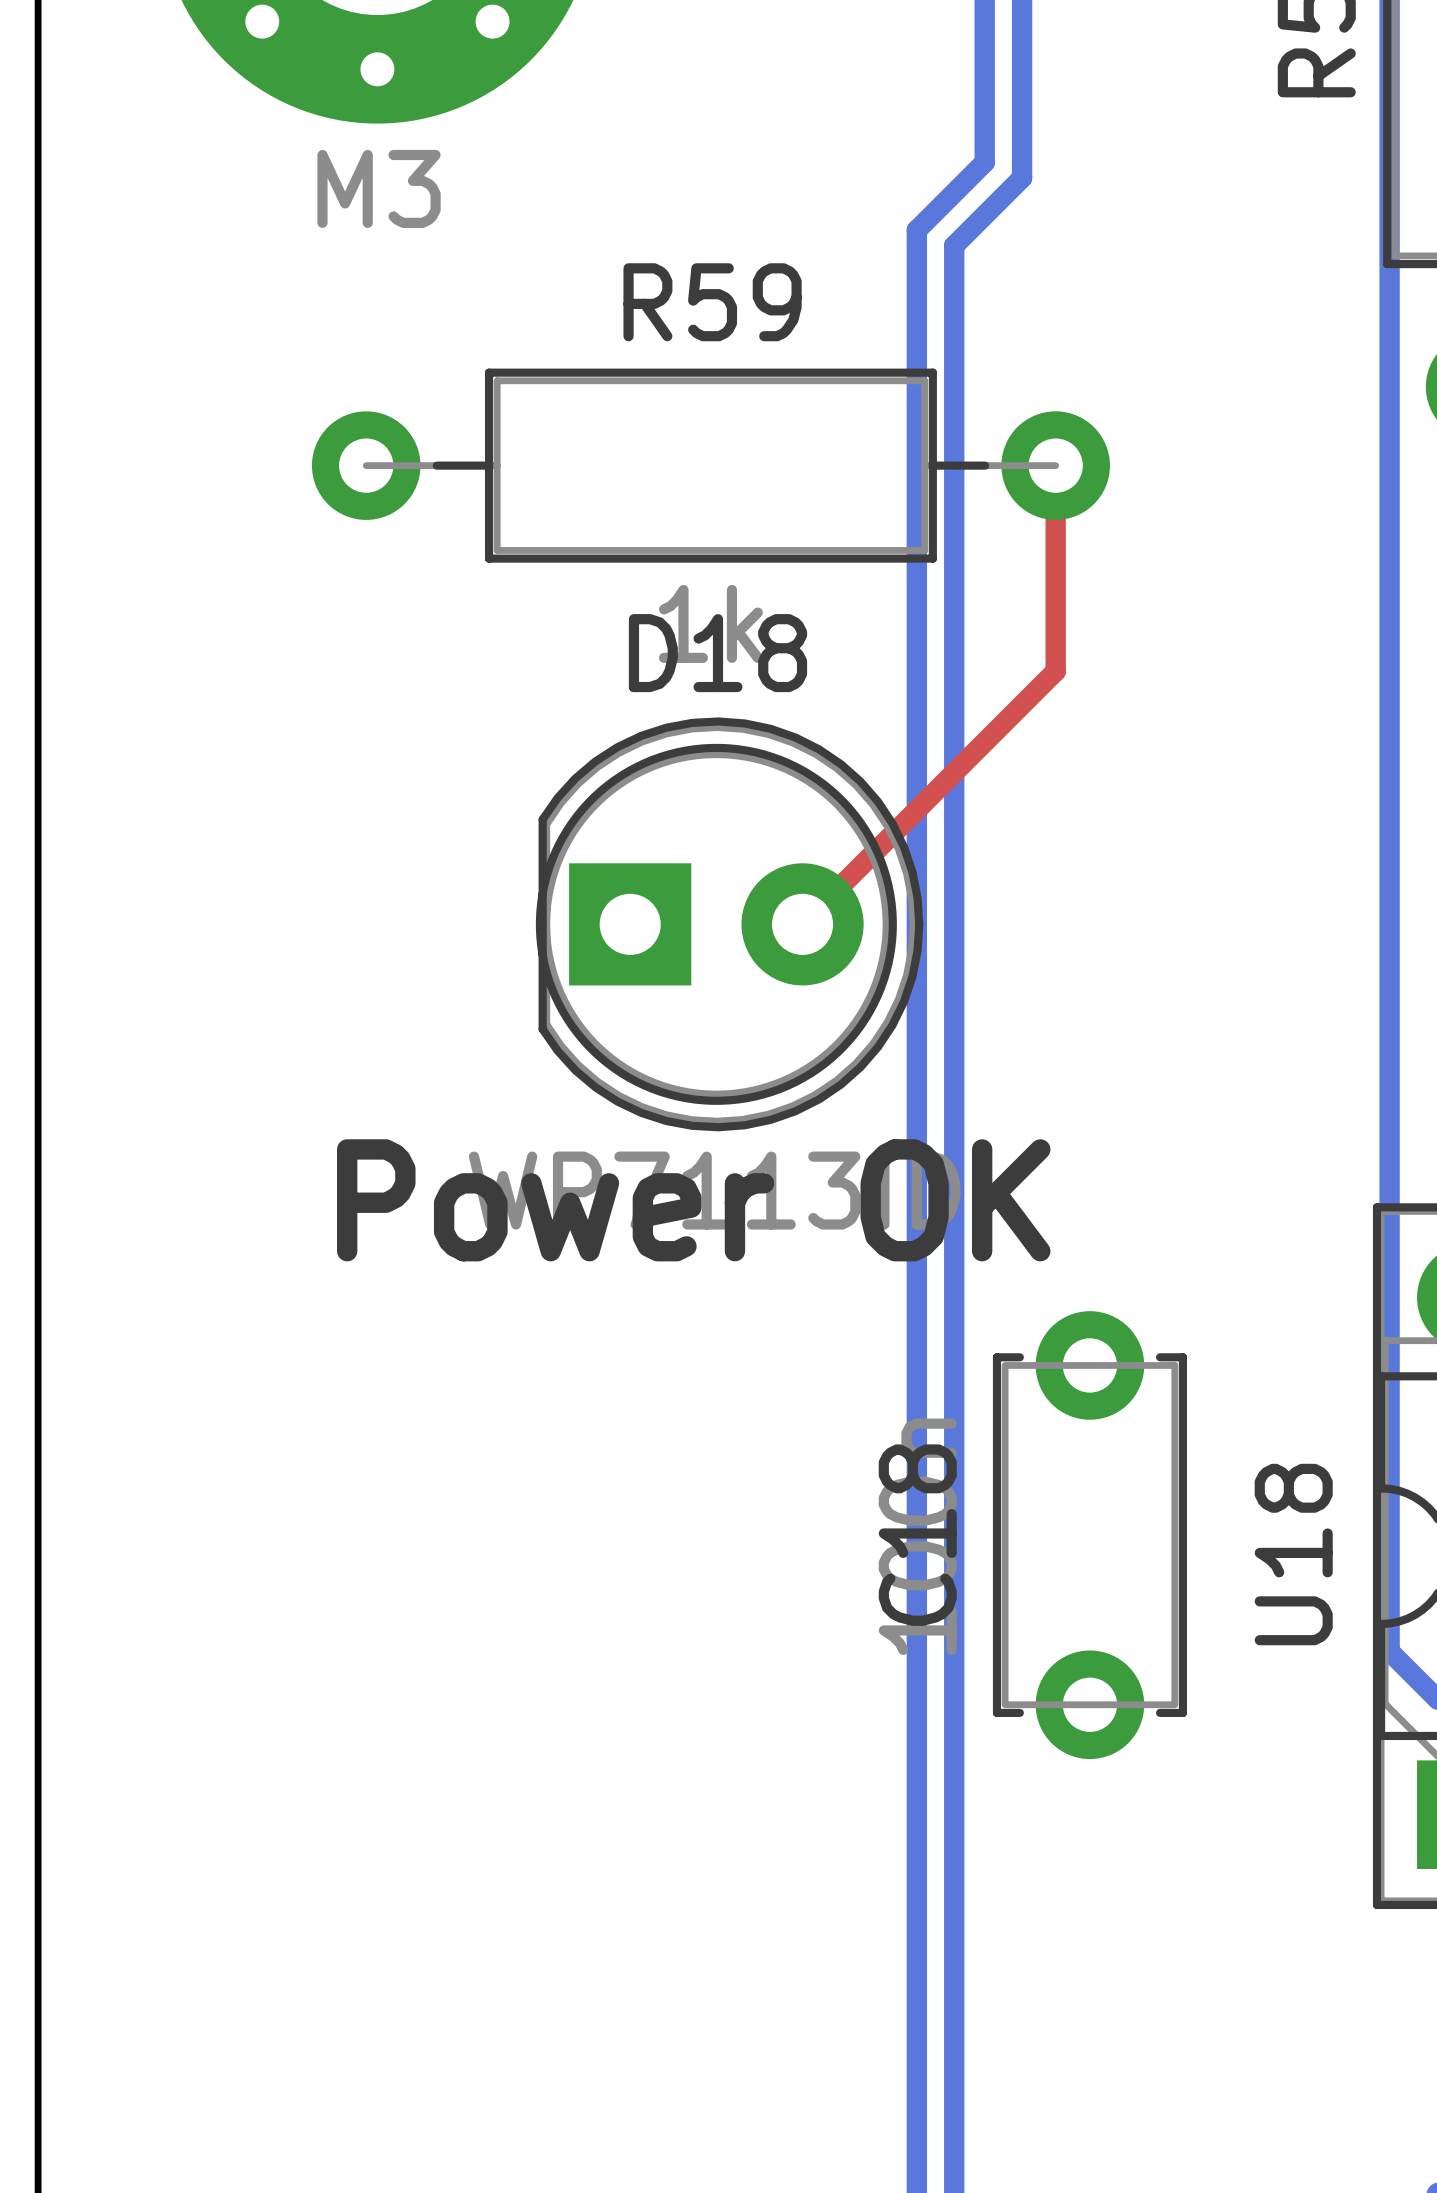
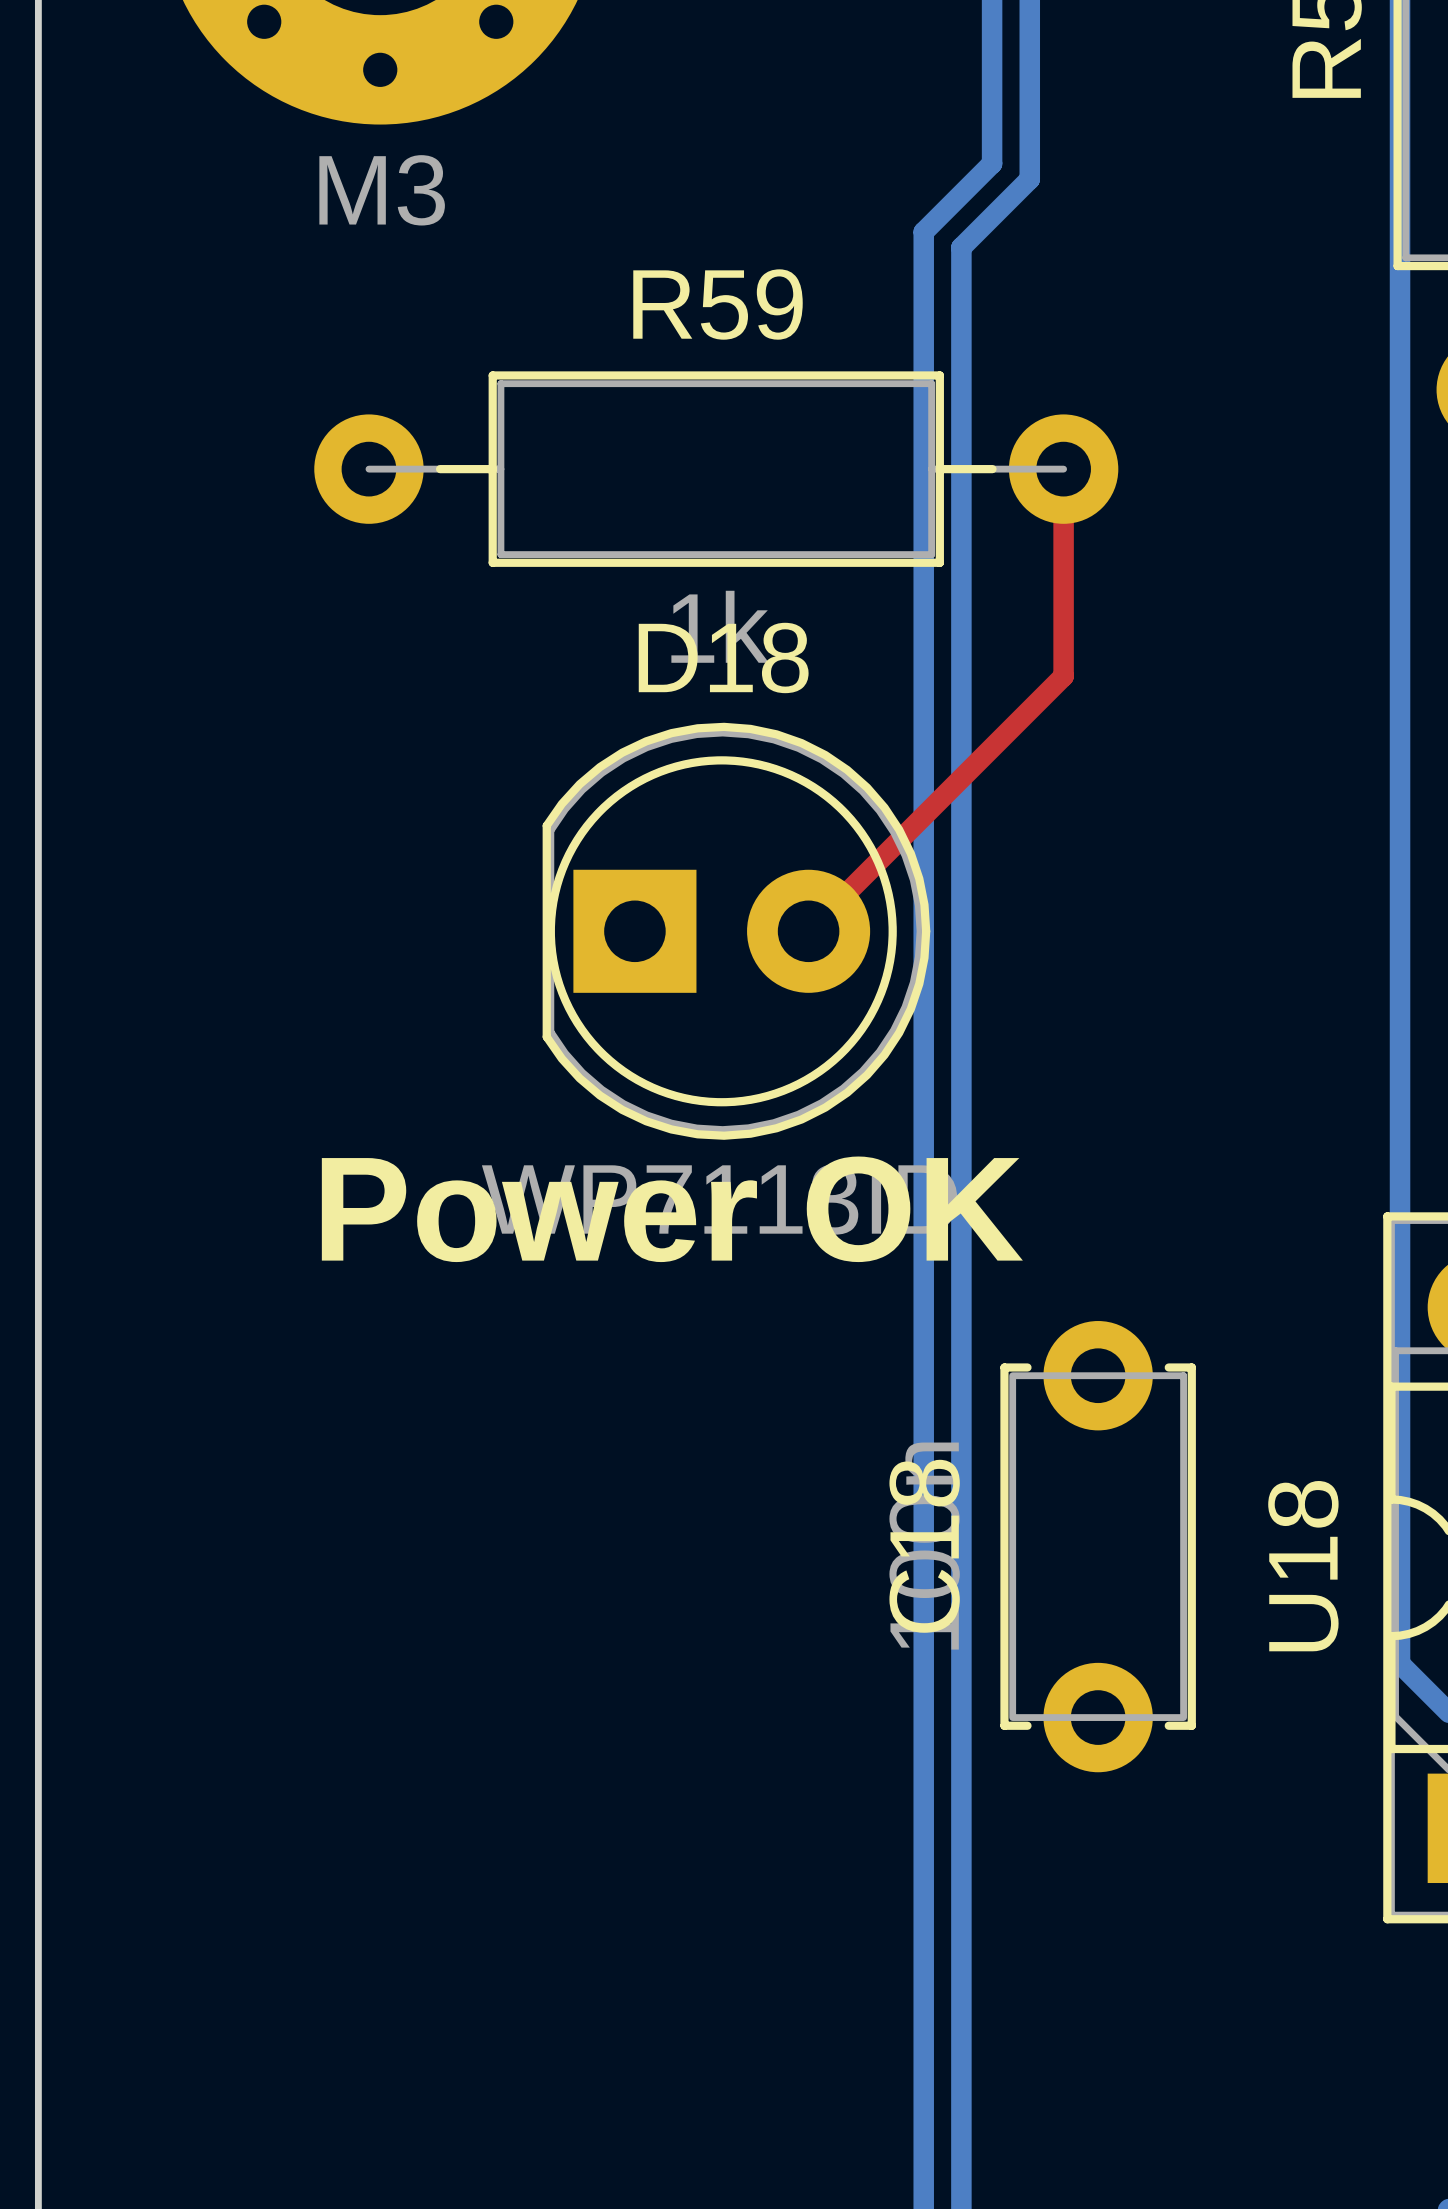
D18 footprint: [535, 717, 924, 1132] -> [542, 722, 931, 1140]

